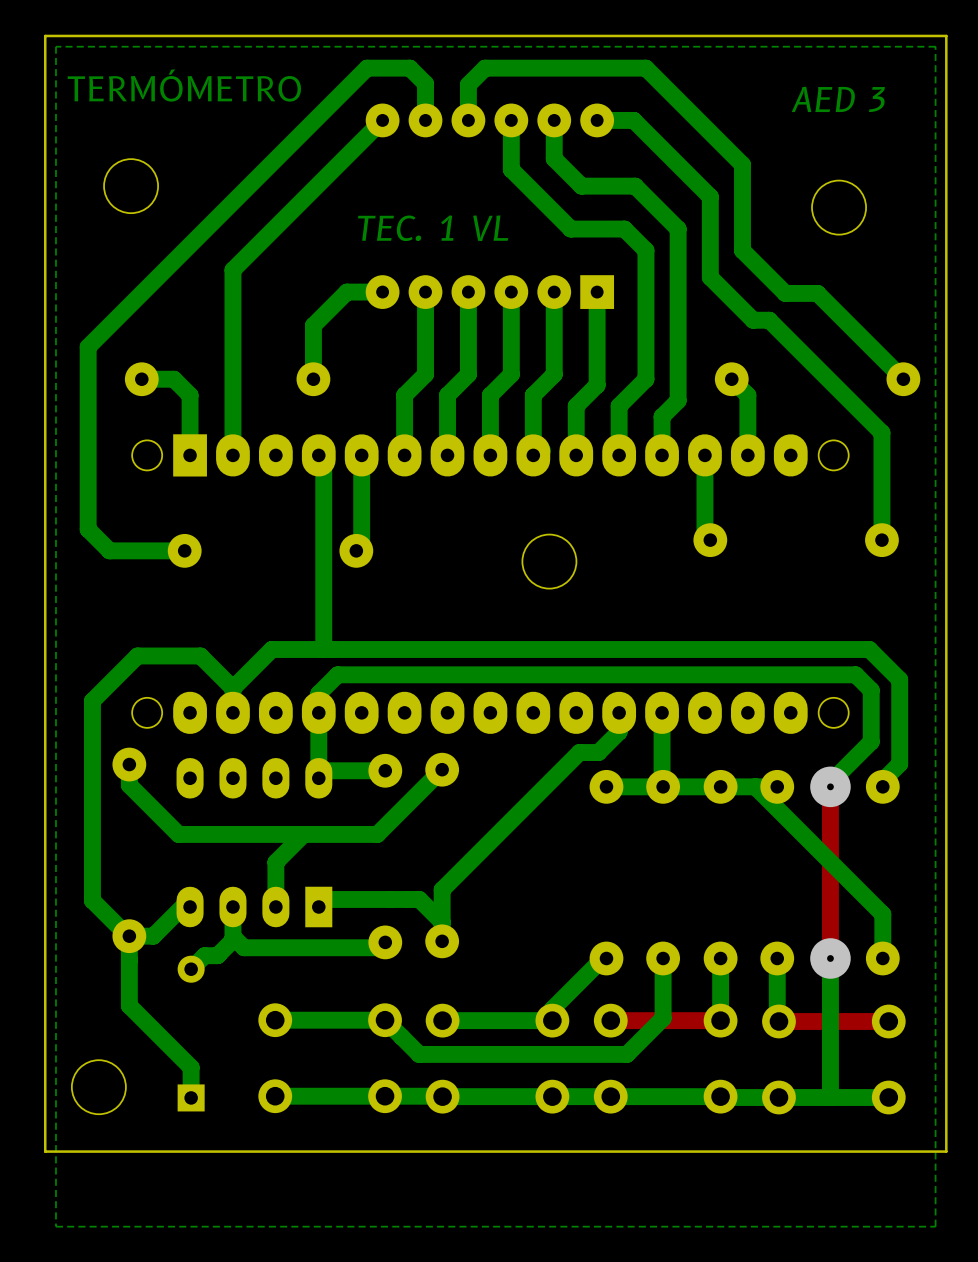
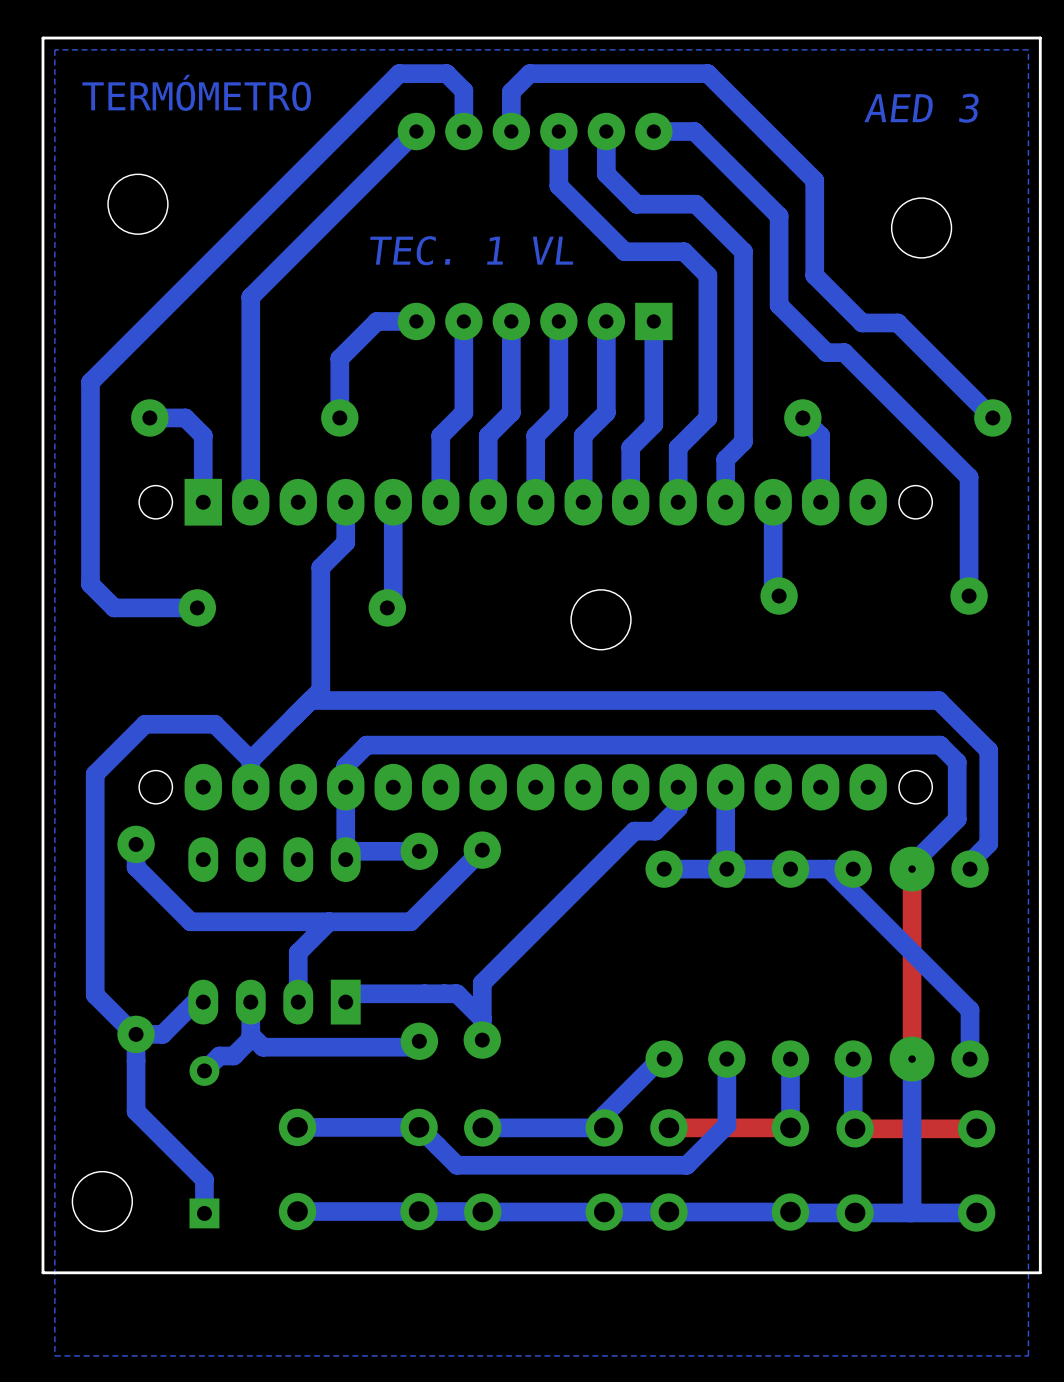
bottom track: (318, 455) (323, 460) (323, 647) (322, 649) -> (345, 502) (345, 542) (320, 567) (320, 690) (293, 717)
bottom track: (869, 649) (271, 649) -> (955, 717) (938, 700) (310, 700)

